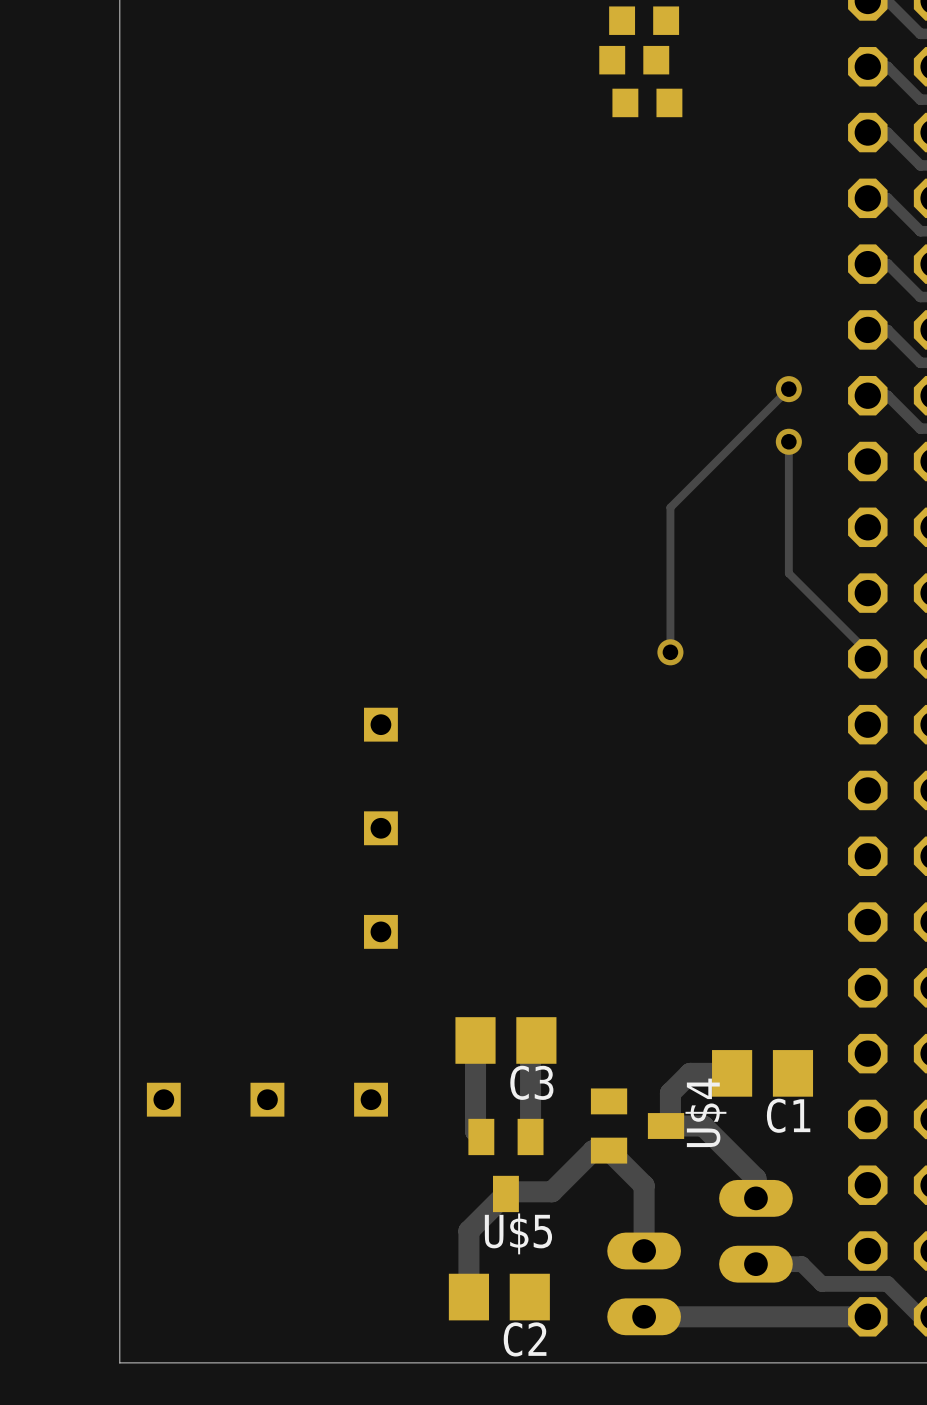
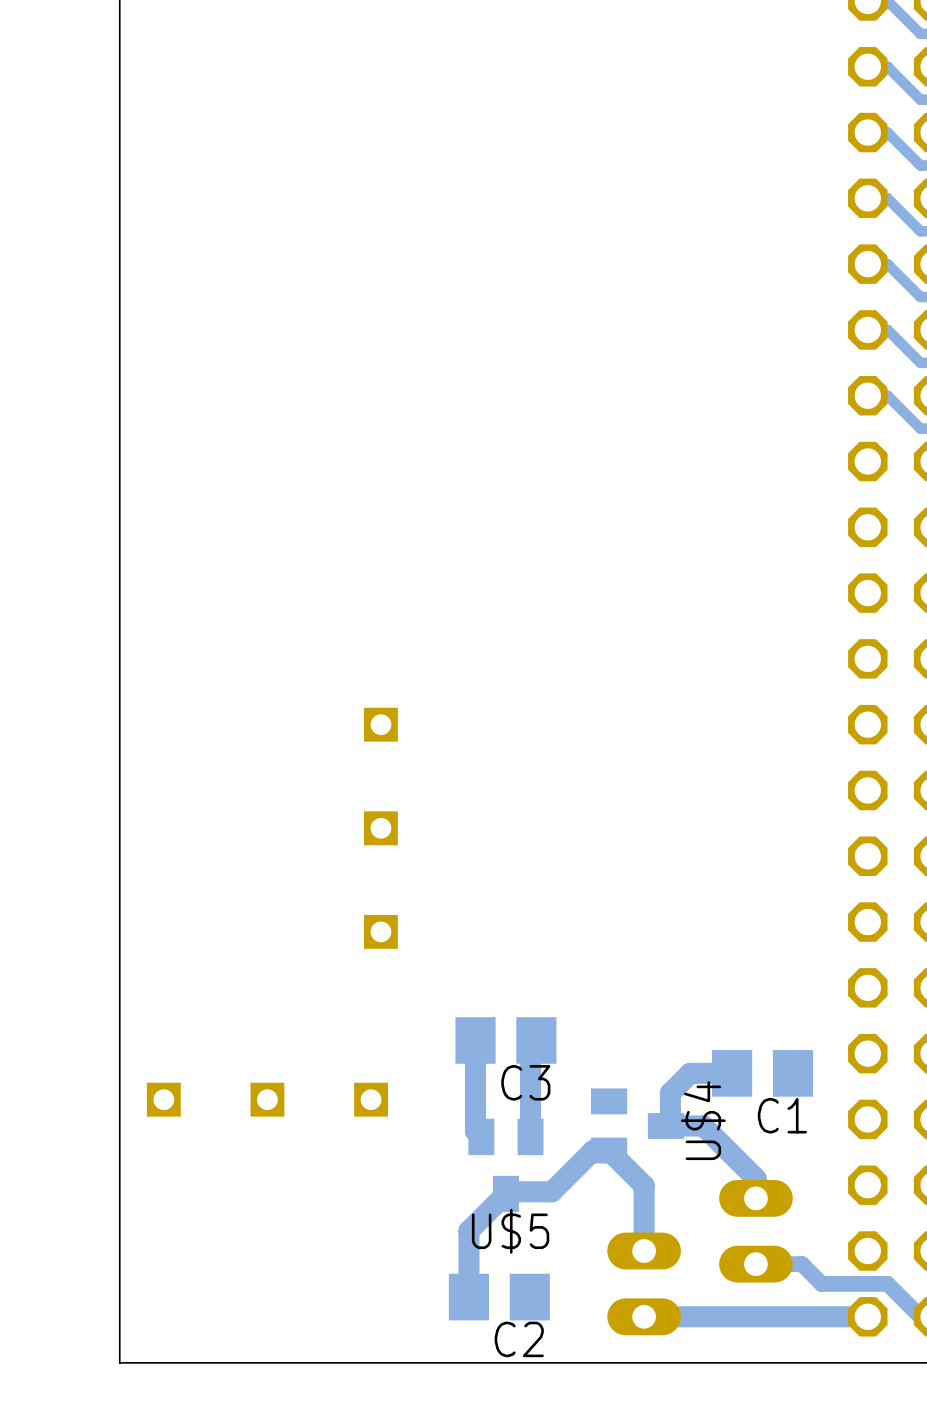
part: (644, 20) -> none
part: (634, 60) -> none
part: (647, 102) -> none
track: (788, 389) (670, 507) (670, 652) -> none
via: (788, 389) -> none
track: (788, 441) (788, 573) (867, 652) (867, 658) -> none
via: (788, 441) -> none
via: (670, 652) -> none

